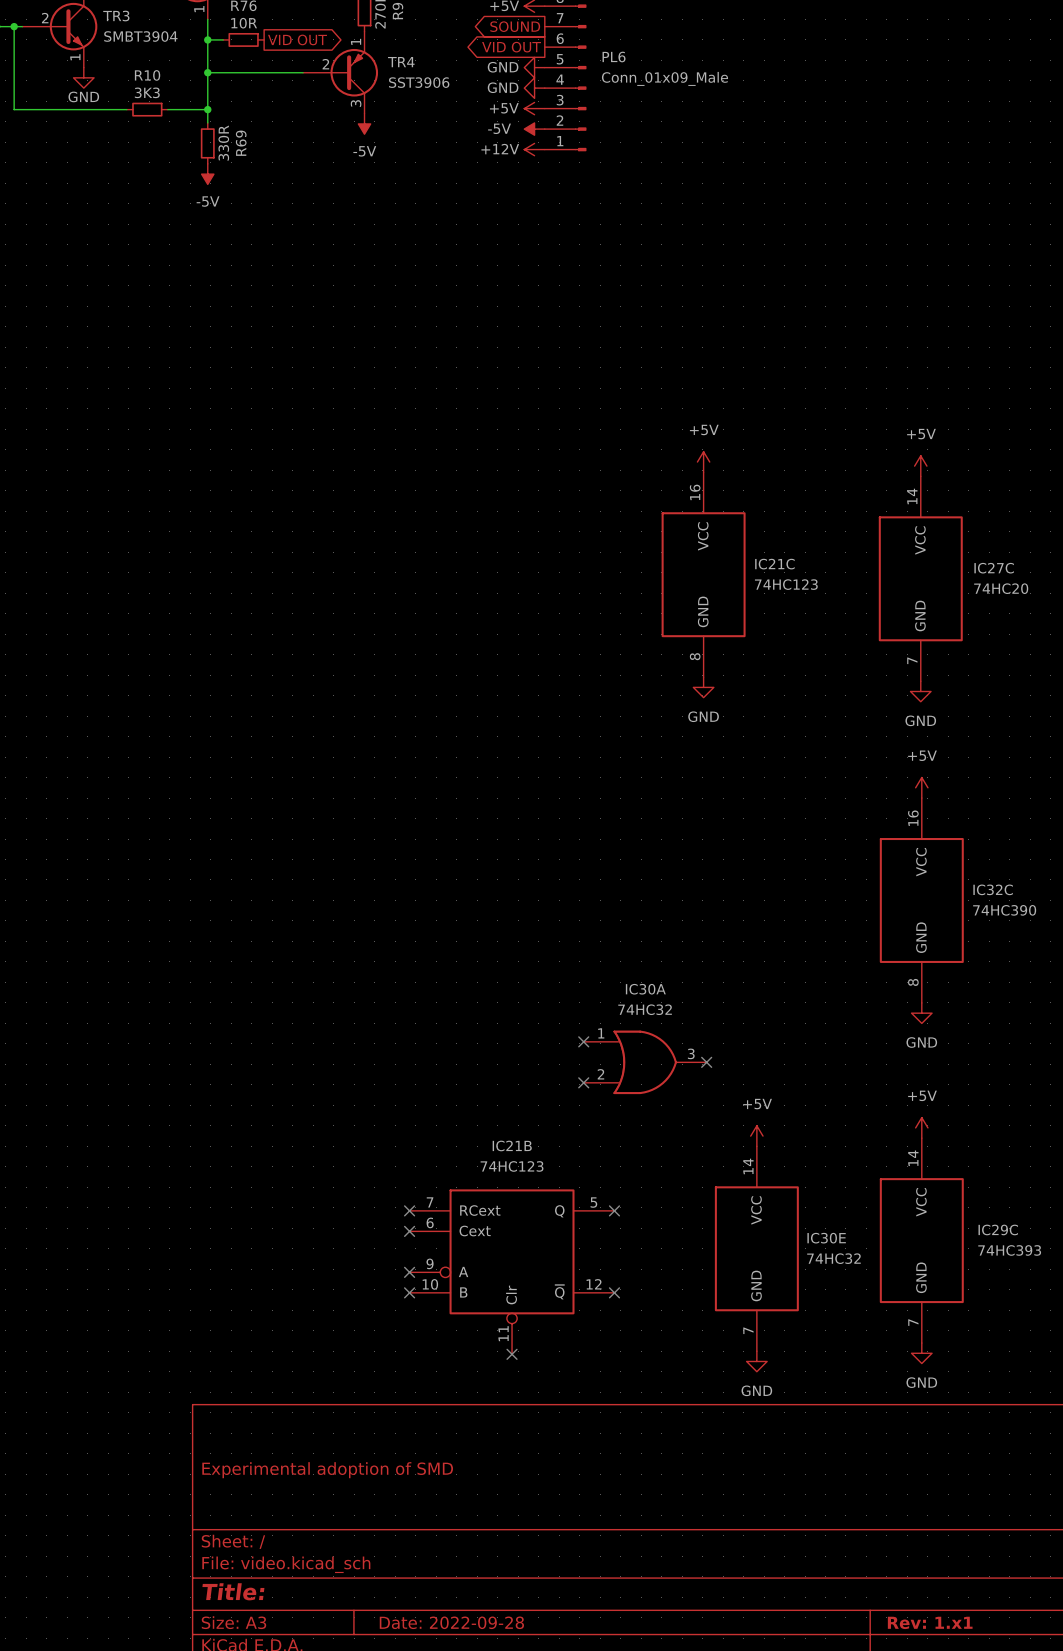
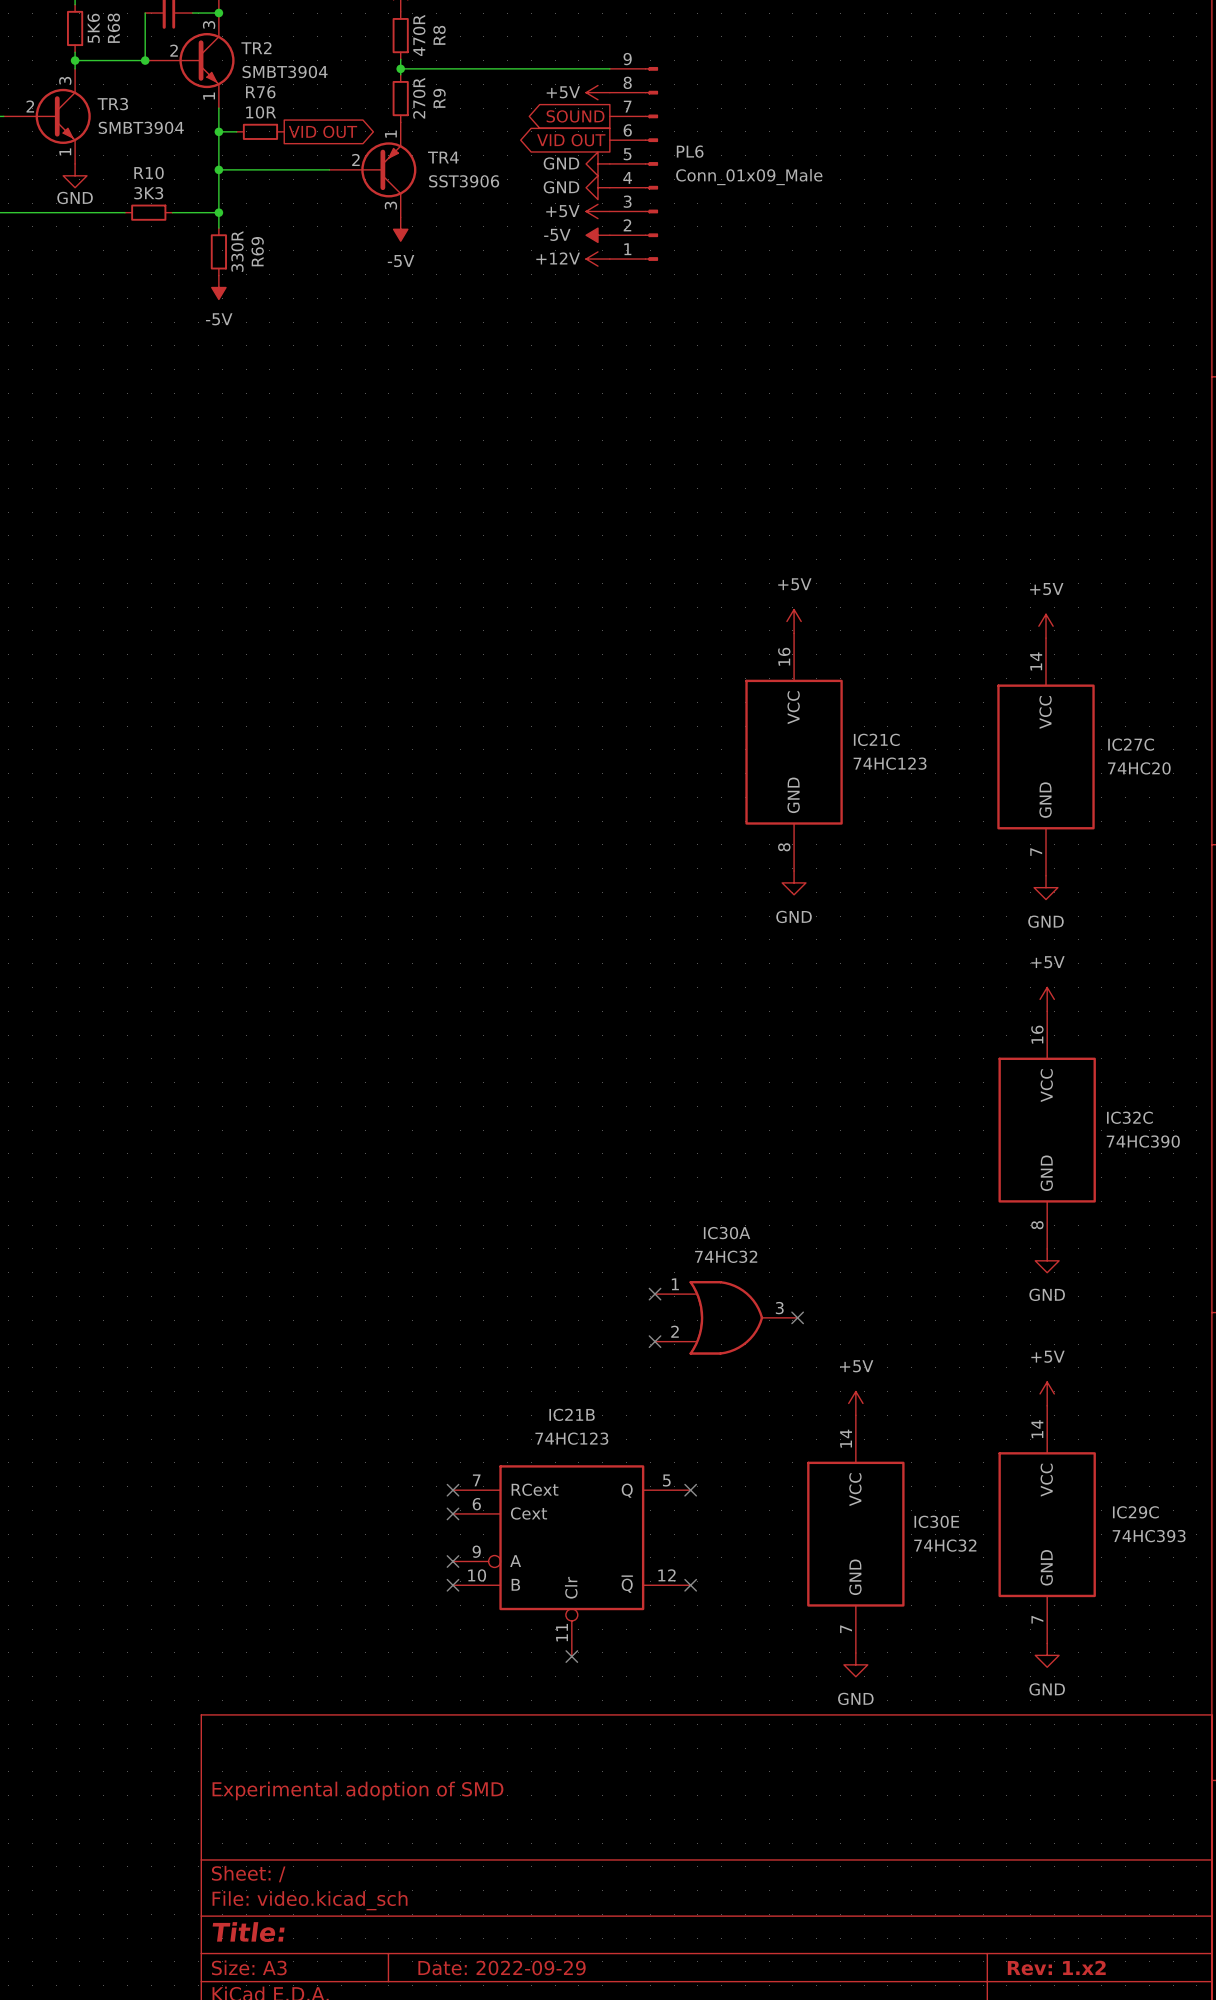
title block: Date: 2022-09-28 (451, 1622) -> Date: 2022-09-29 (502, 1968)
title block: Rev: 1.x1 (930, 1622) -> Rev: 1.x2 (1056, 1968)

